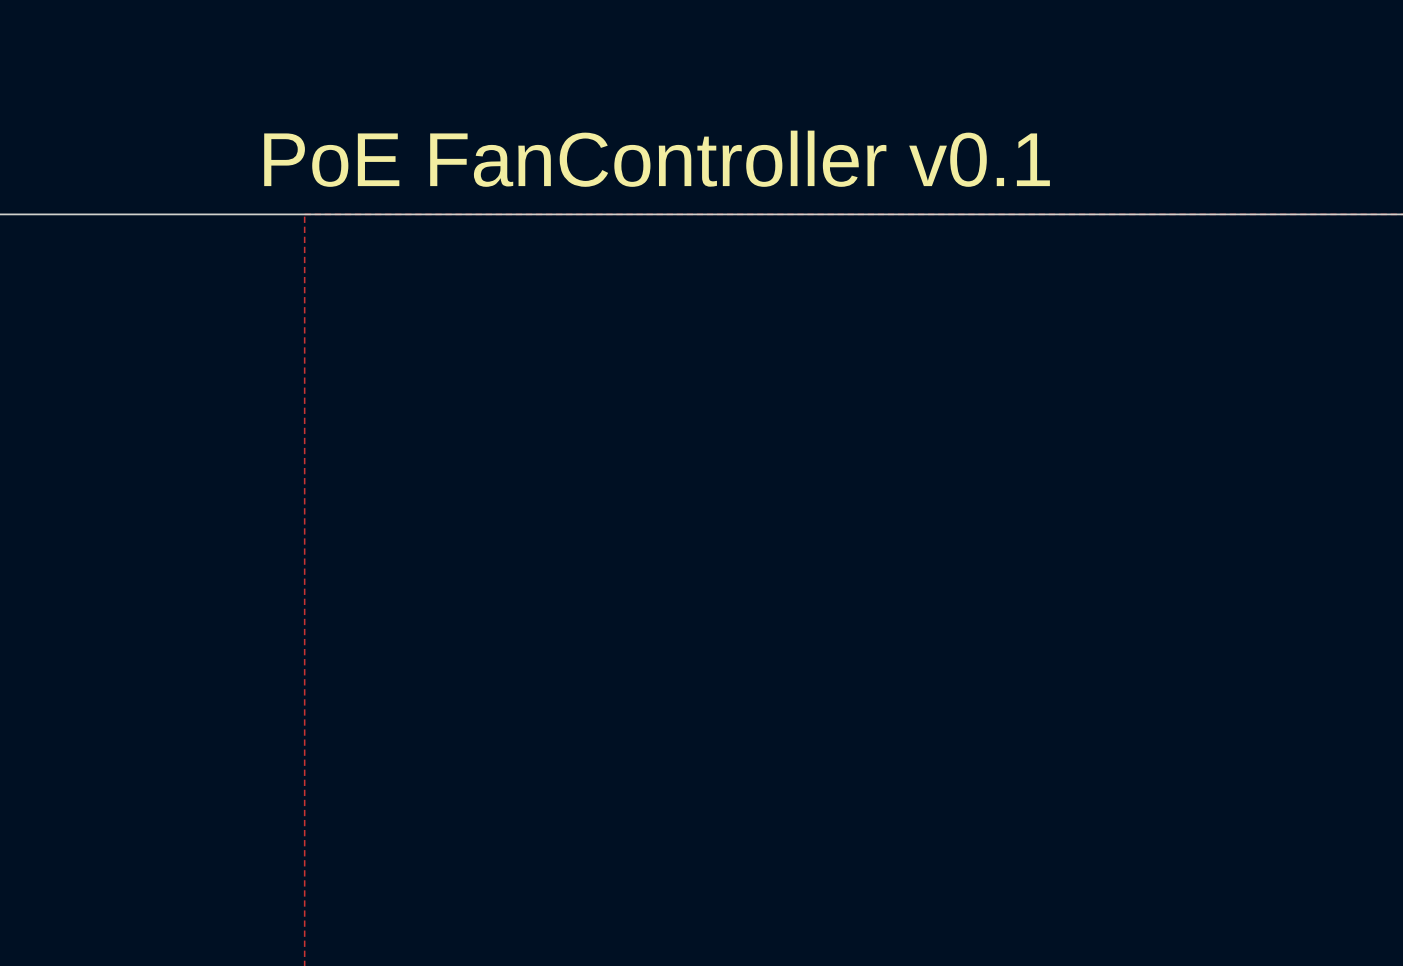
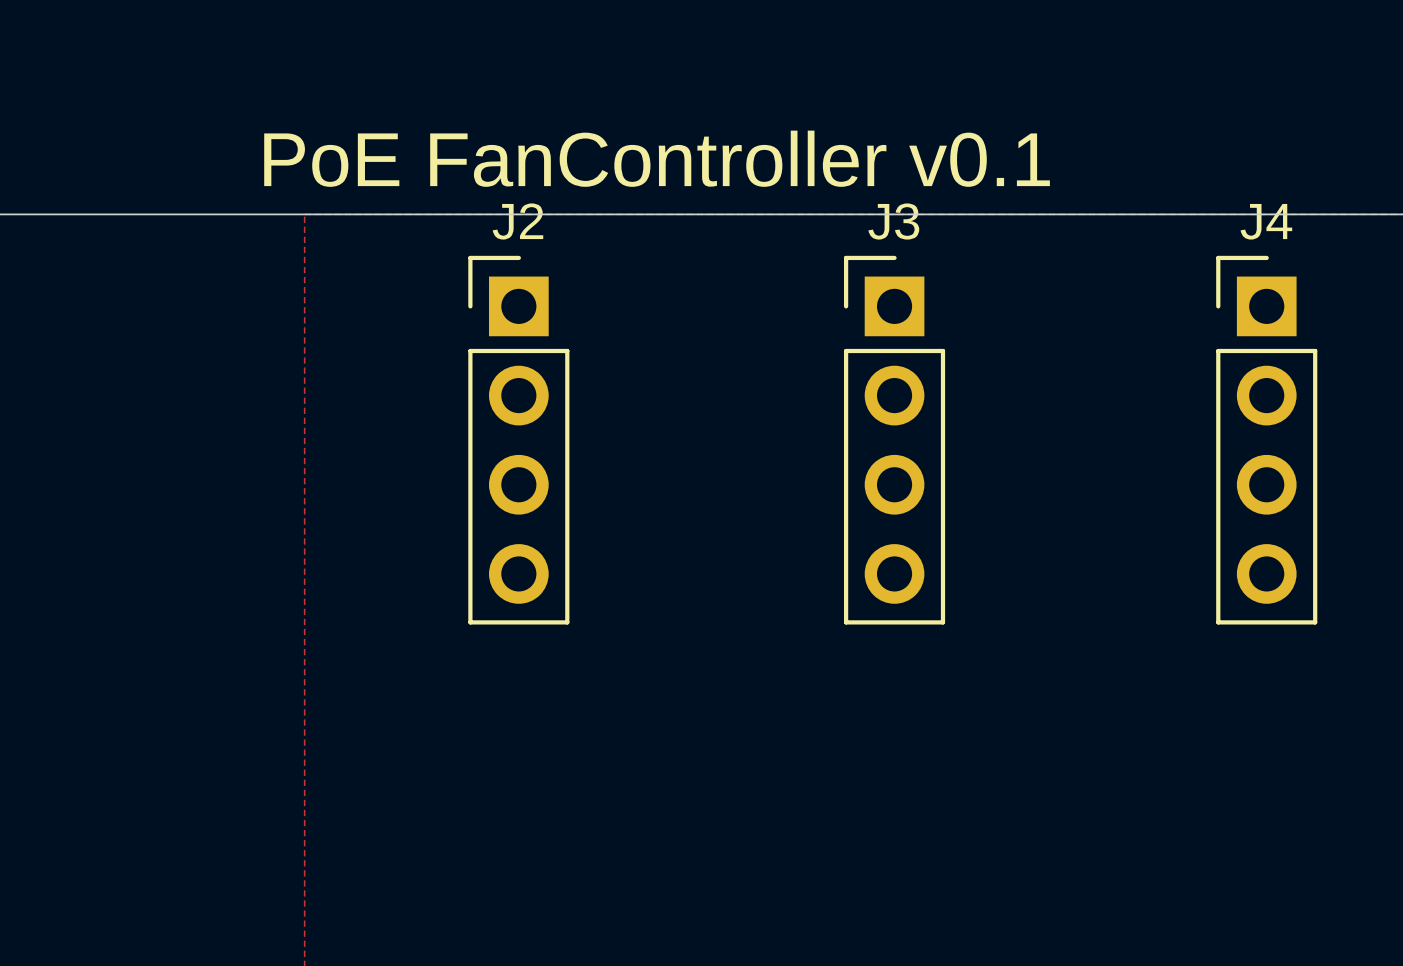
J2: none -> (518, 440)
J3: none -> (894, 440)
J4: none -> (1266, 440)

